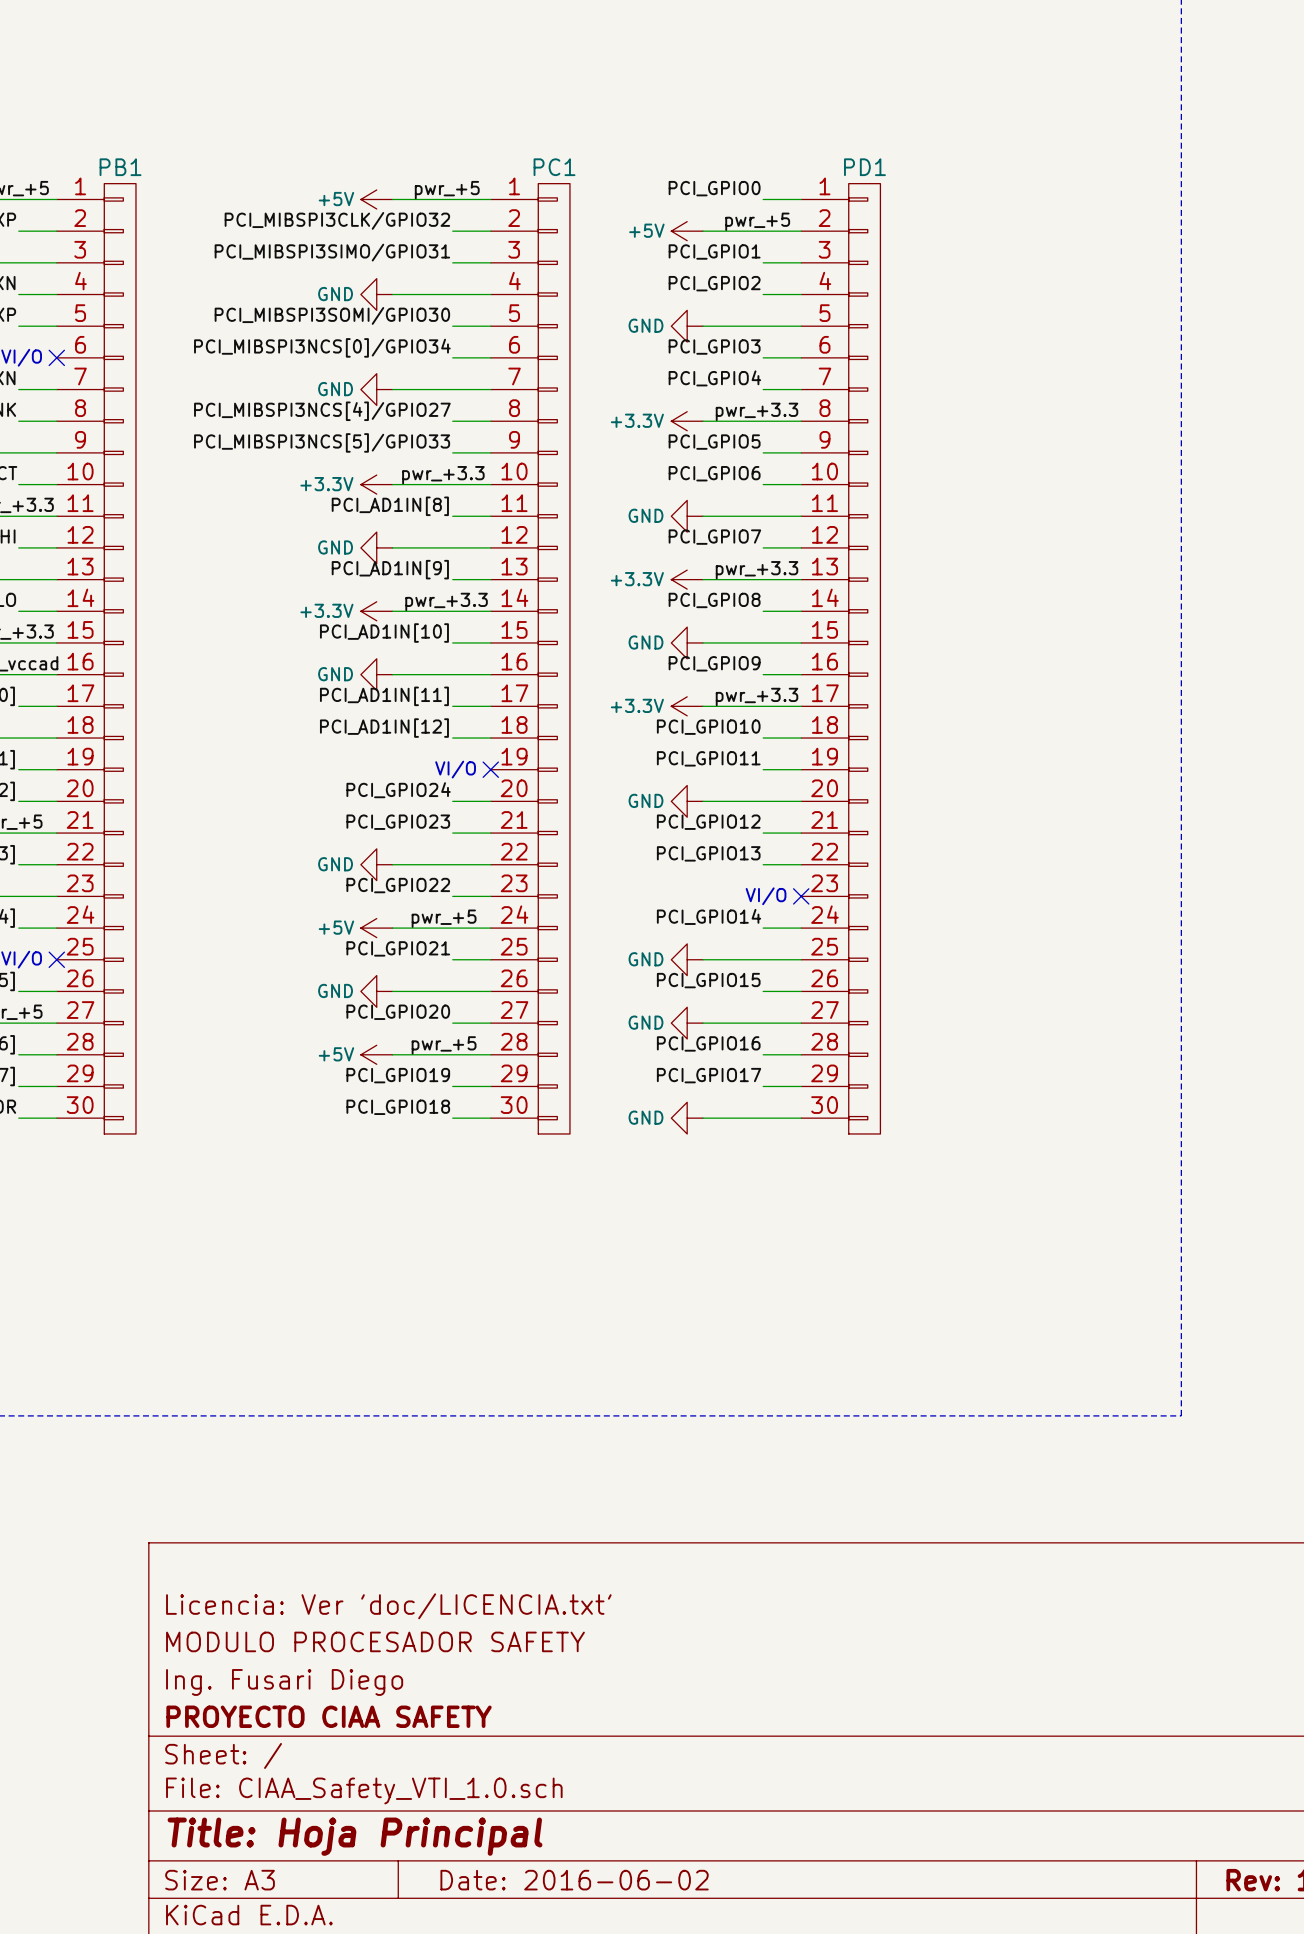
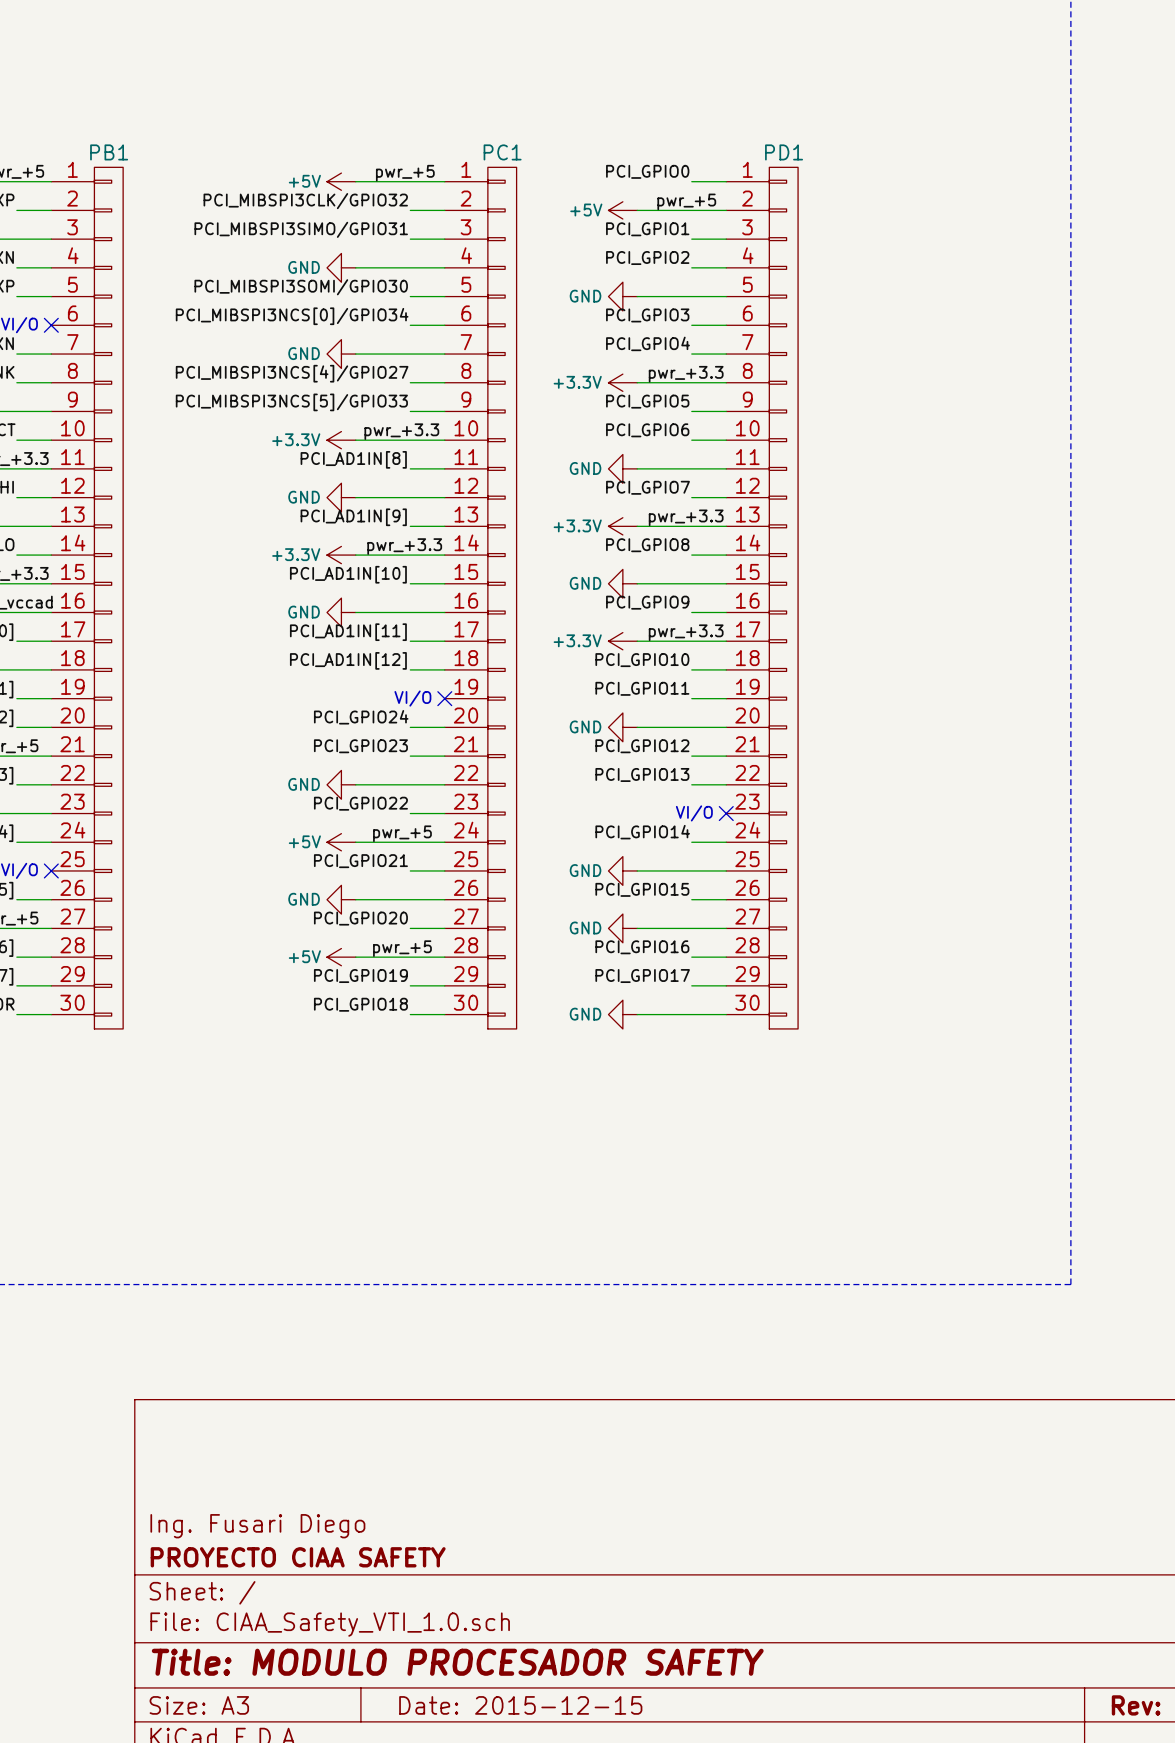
title block: Licencia: Ver 'doc/LICENCIA.txt' (388, 1606) -> none
title block: MODULO PROCESADOR SAFETY (375, 1641) -> none
title block: Title: Hoja Principal (355, 1836) -> Title: MODULO PROCESADOR SAFETY (457, 1662)
title block: Date: 2016-06-02 (574, 1880) -> Date: 2015-12-15 (520, 1705)

